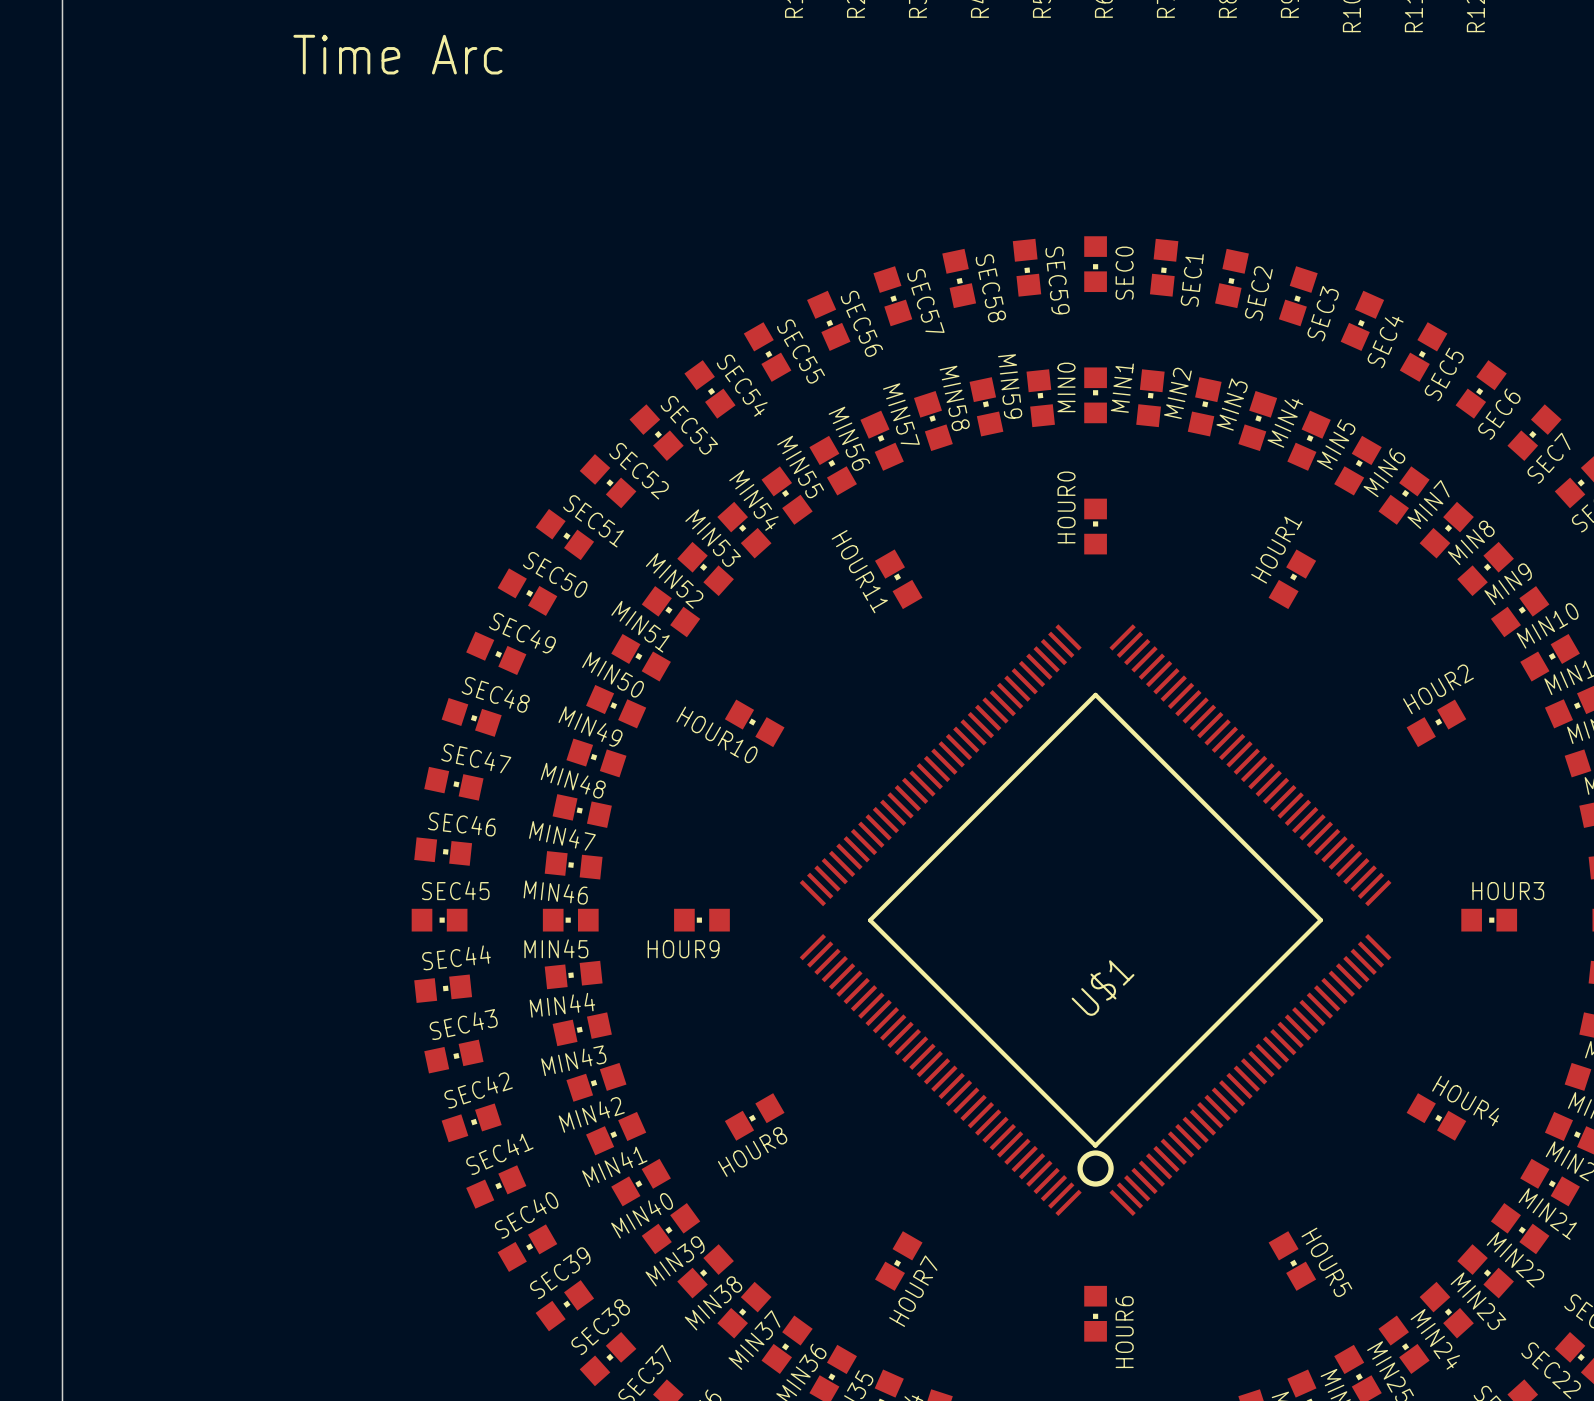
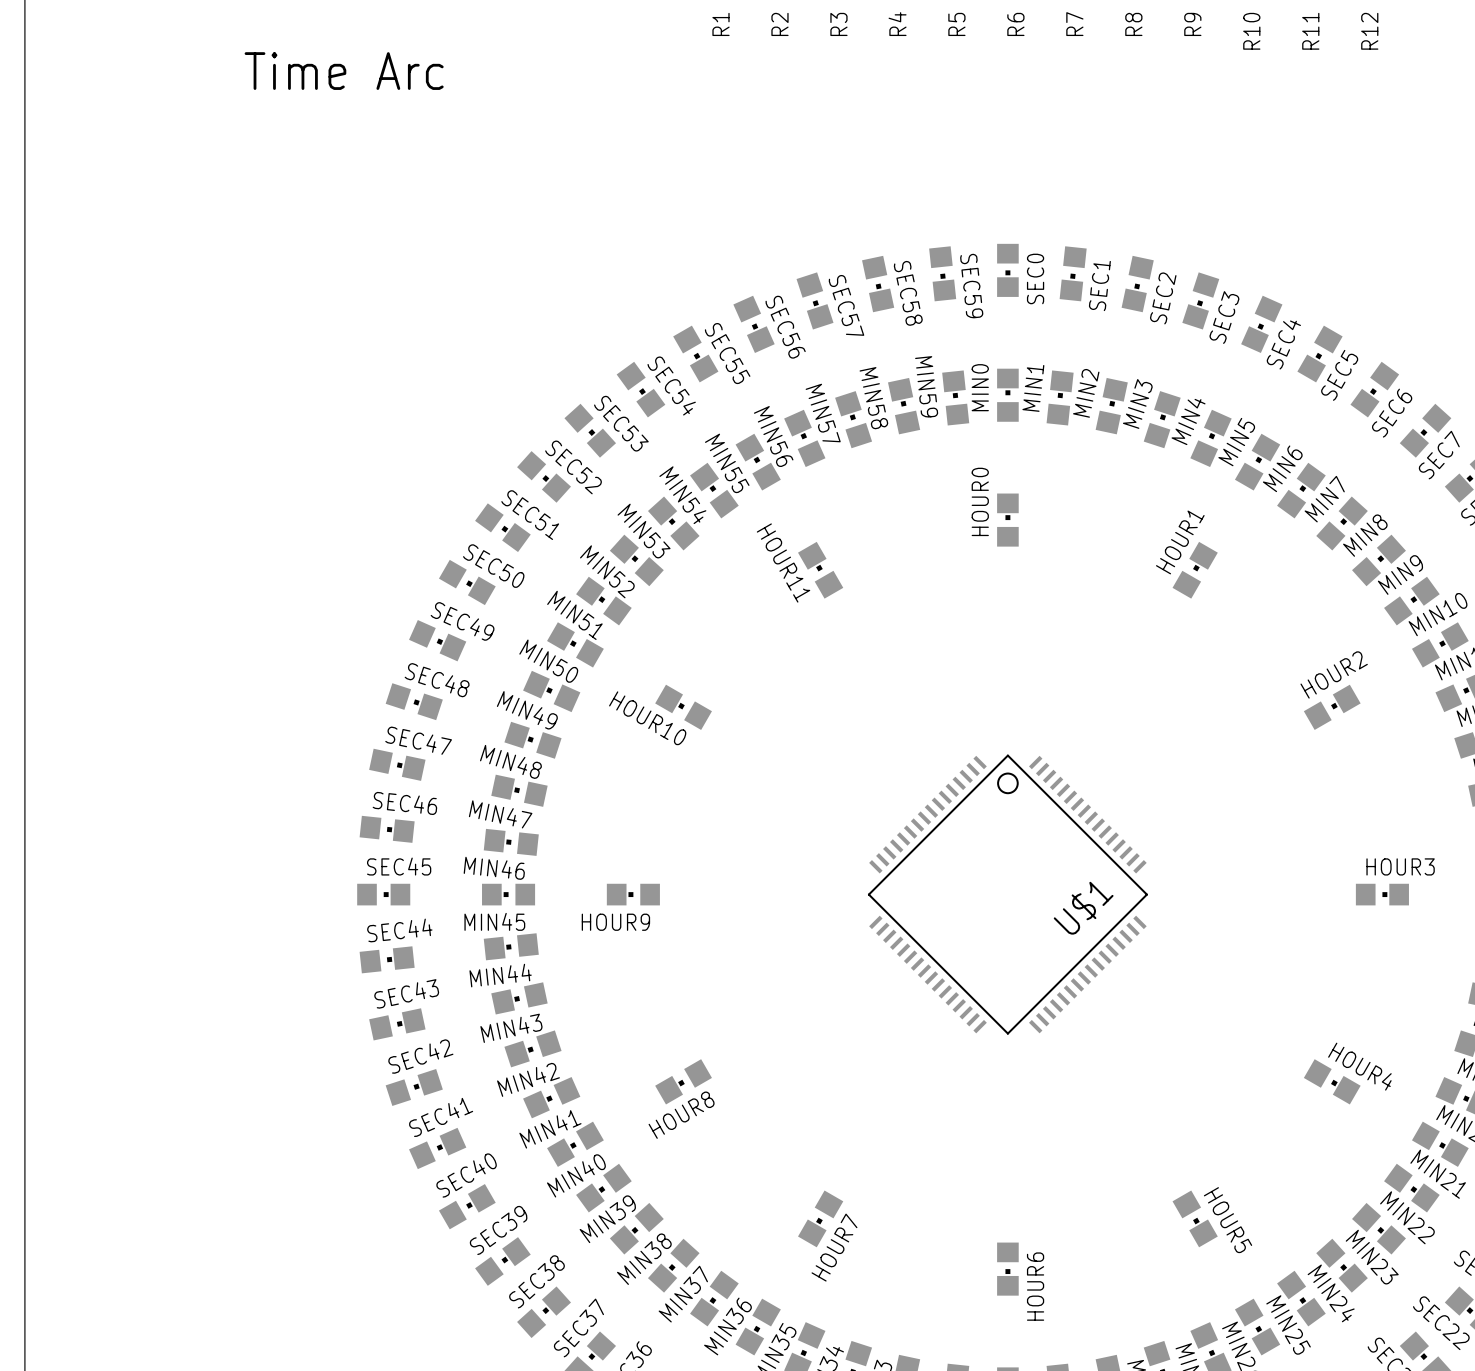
U$1 footprint: [799, 624, 1392, 1217] -> [867, 754, 1148, 1035]
U$1 name position: U$1 (1103, 988) -> U$1 (1083, 908)

